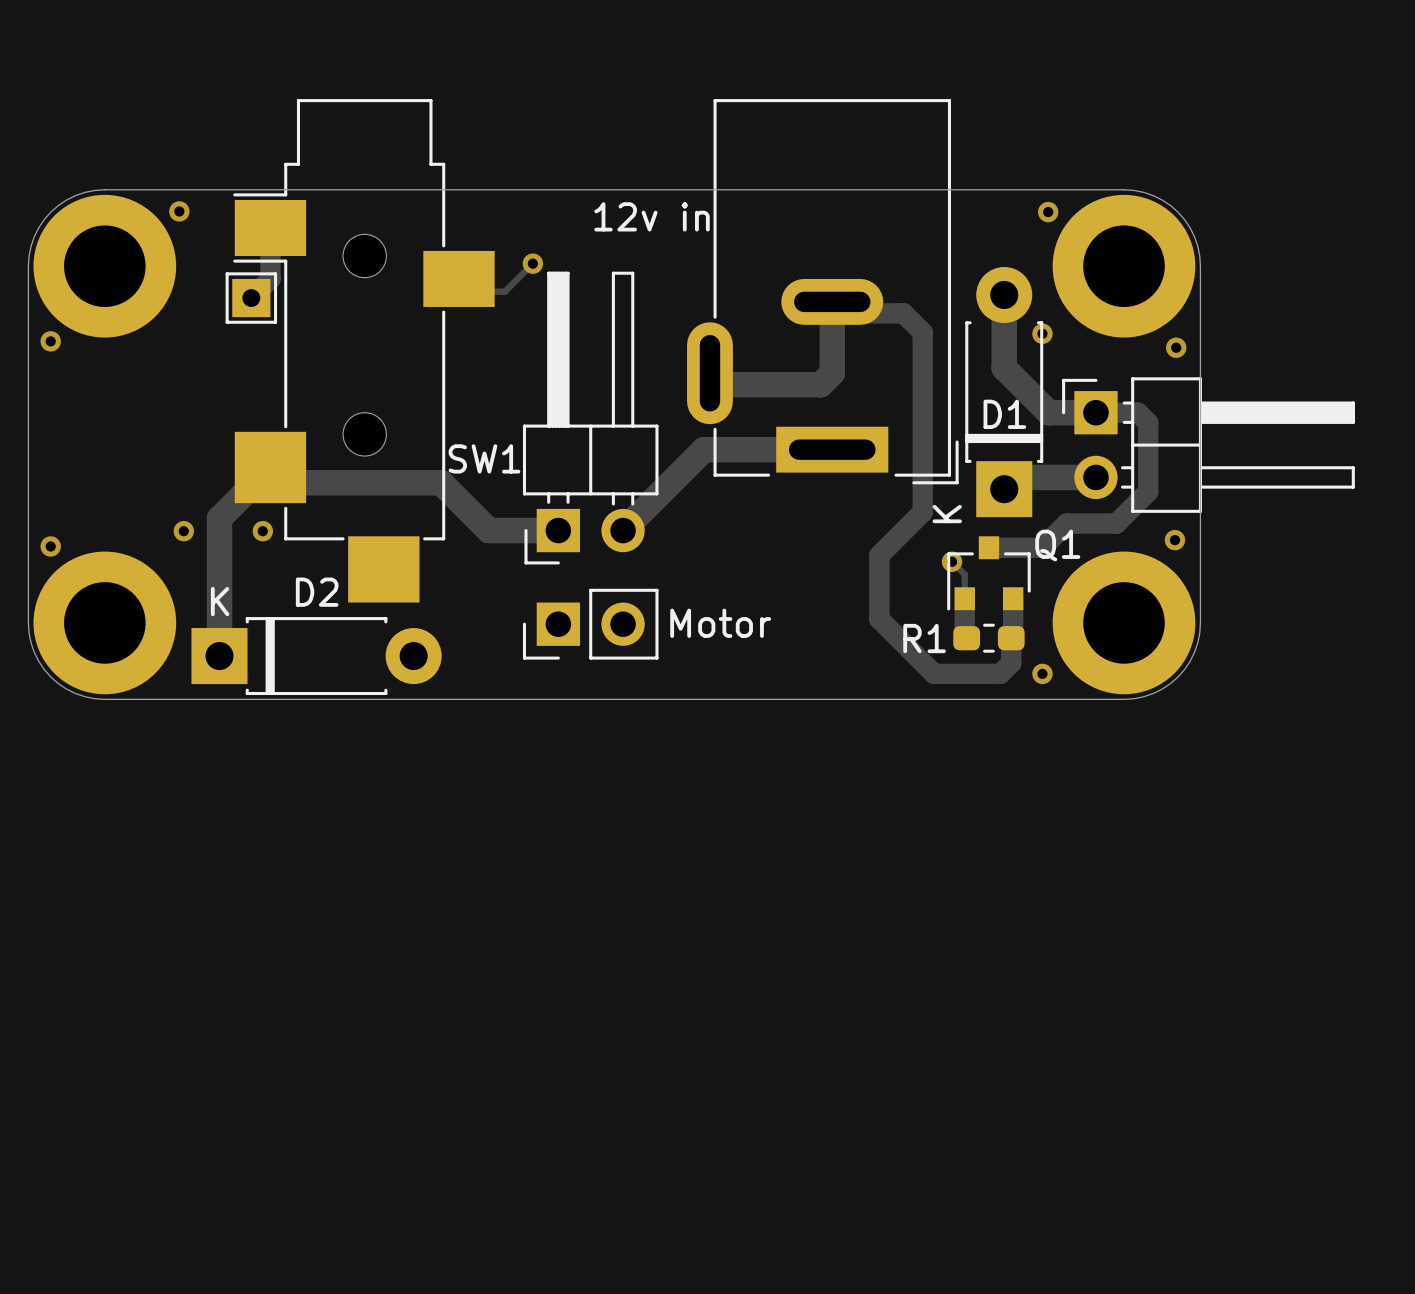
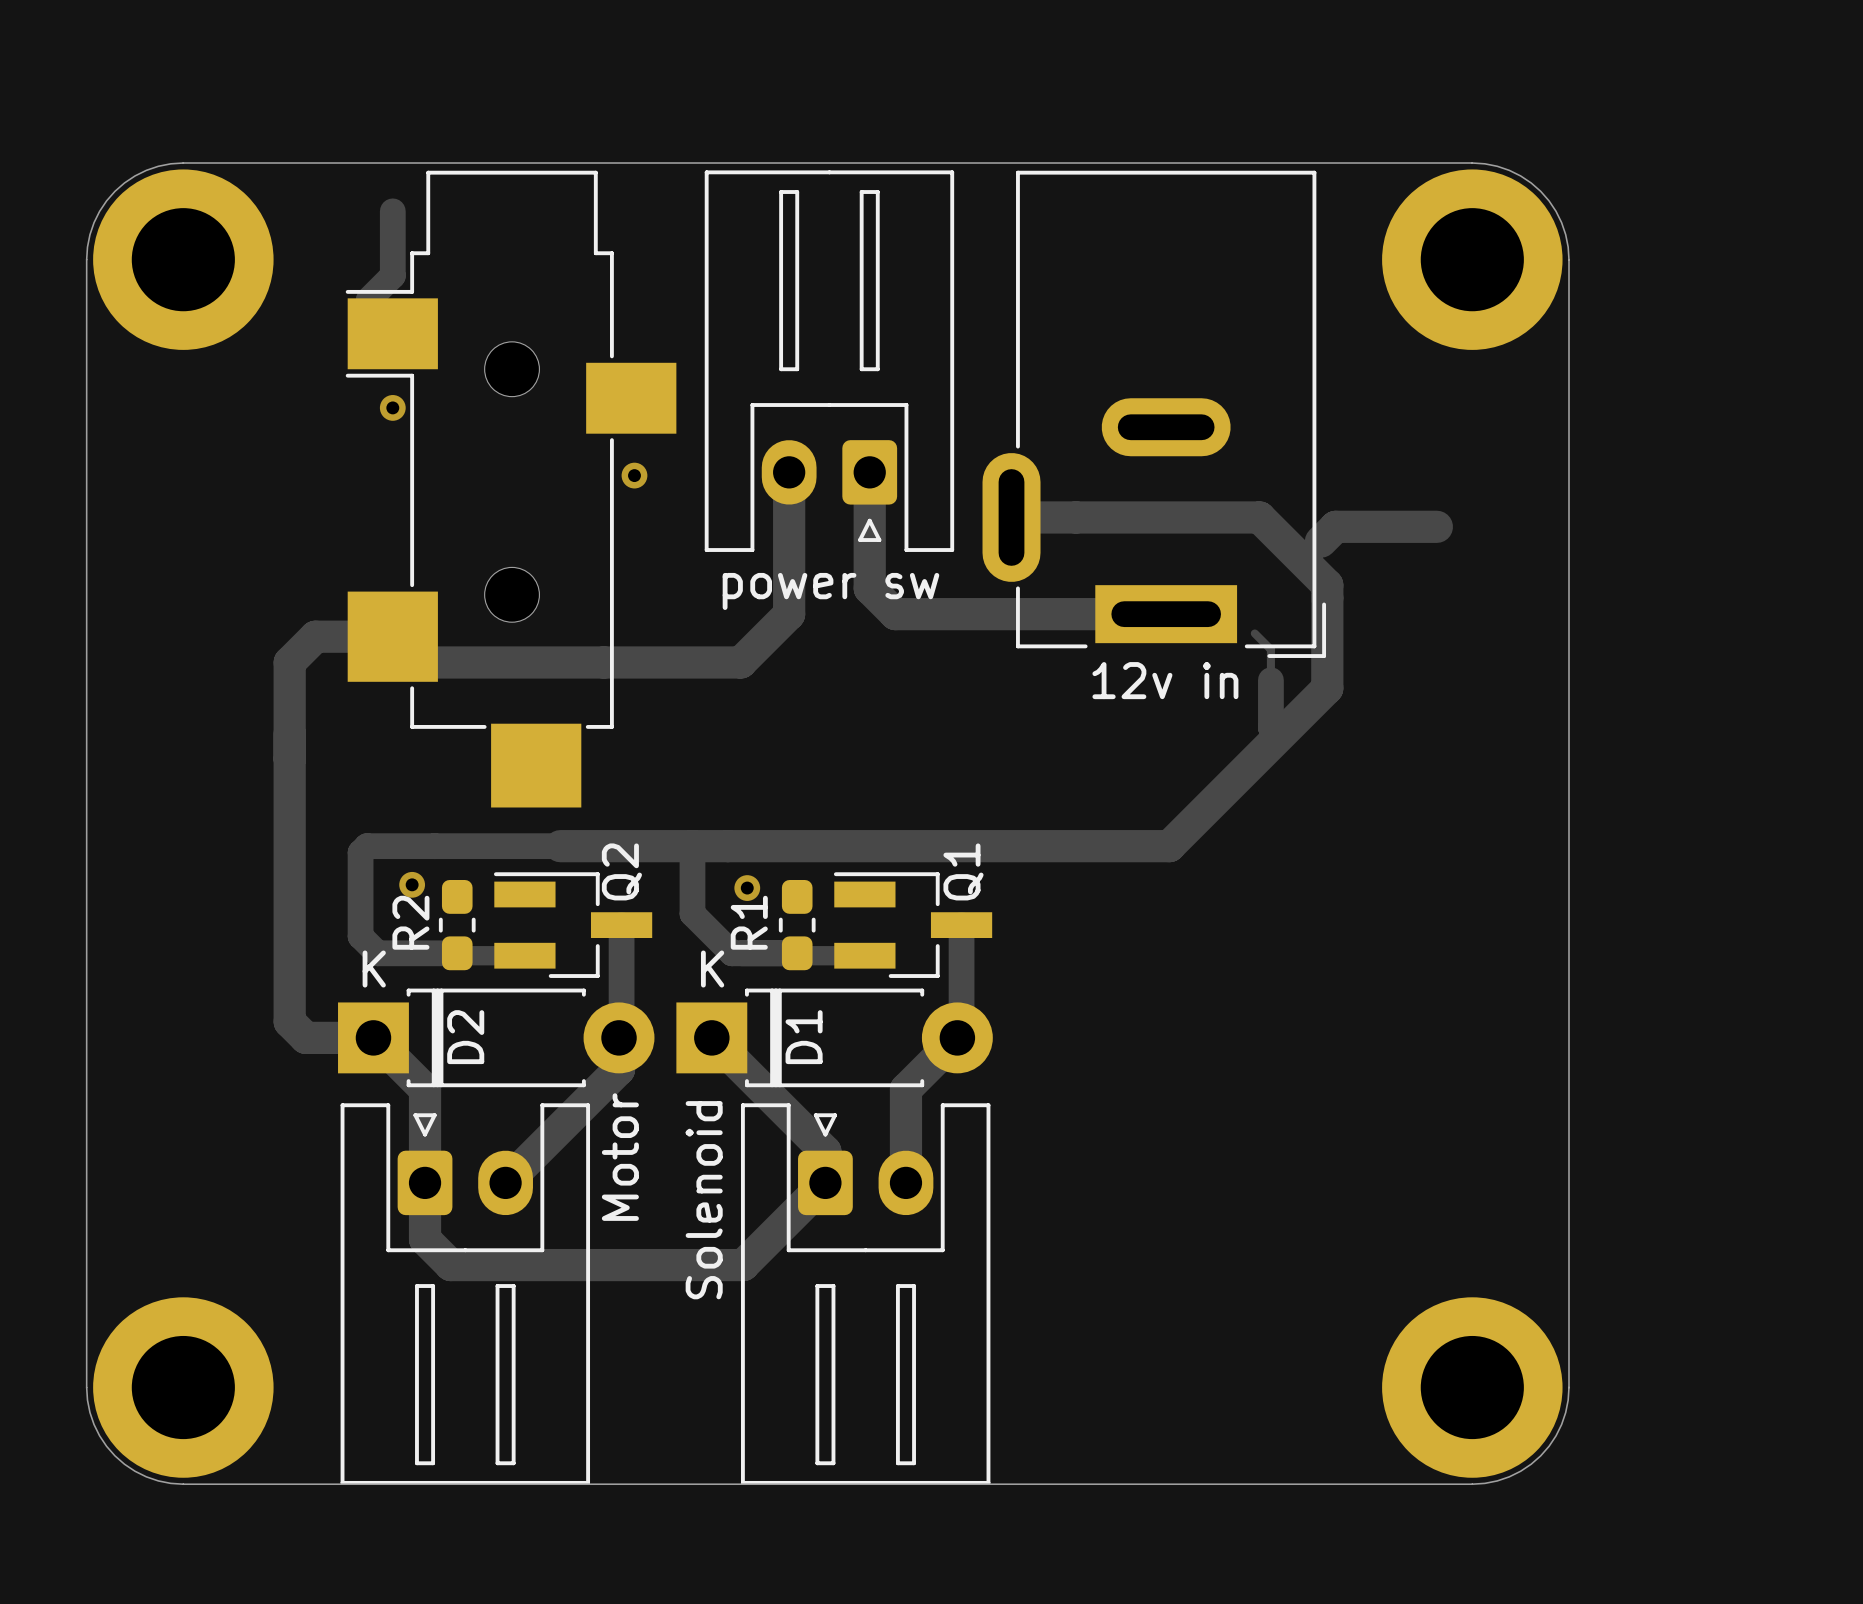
via: (179, 211) -> none
via: (1048, 212) -> none
part value position: 12v in (652, 216) -> 12v in (1165, 680)
track: (532, 263) (504, 291) (458, 291) -> none
via: (532, 263) -> none
D1 footprint: [965, 266, 1044, 518] -> [676, 988, 993, 1088]
part position: (822, 291) -> (1154, 414)
track: (1004, 295) (1004, 368) (1048, 412) (1138, 412) (1148, 422) (1148, 491) (1116, 523) (1066, 523) (1042, 547) (988, 547) -> none
part: (251, 298) -> none
via: (1042, 333) -> none
via: (50, 341) -> none
part: none -> power sw (829, 361)
via: (1176, 347) -> none
part position: (363, 350) -> (511, 489)
via: none -> (392, 407)
track: (709, 384) (820, 384) (832, 373) (832, 313) (903, 313) (922, 332) (922, 512) (879, 555) (879, 619) (934, 673) (1000, 673) (1011, 663) (1013, 598) -> none
SW1: (590, 418) -> none
track: none -> (789, 472) (789, 614) (740, 662) (415, 662) (412, 659)
track: none -> (869, 472) (869, 588) (895, 614) (1166, 614)
via: none -> (634, 475)
part: (1208, 445) -> none
track: (832, 449) (703, 449) (623, 530) -> none
track: (270, 467) (219, 518) (219, 656) -> none
track: none -> (1011, 517) (1259, 517) (1327, 585) (1327, 688) (1169, 846) (367, 846) (360, 852) (360, 936) (377, 953) (524, 955)
track: (280, 482) (441, 482) (488, 530) (558, 530) -> none
via: (183, 531) -> none
via: (262, 531) -> none
Q1 footprint: [947, 536, 1031, 611] -> [833, 872, 993, 978]
via: (1174, 540) -> none
via: (50, 546) -> none
via: (952, 561) -> none
track: none -> (392, 636) (315, 636) (289, 662) (289, 1021) (305, 1037) (373, 1037) (425, 1089) (425, 1239) (450, 1265) (743, 1265) (825, 1182) (825, 1151) (711, 1037)
D2 name rotation: 0° (317, 592) -> 90° counterclockwise (465, 1037)
D2 name position: D2 (317, 592) -> D2 (465, 1037)
board edge: (28, 622) (34, 652) (50, 676) (75, 693) (104, 699) (1133, 698) (1162, 689) (1184, 669) (1194, 652) (1200, 622) -> (86, 710) (87, 1400) (94, 1424) (99, 1435) (114, 1455) (135, 1471) (146, 1476) (170, 1483) (183, 1484) (1472, 1484) (1497, 1480) (1520, 1471) (1540, 1455) (1556, 1435) (1565, 1412) (1568, 1387) (1568, 710)
part position: (104, 622) -> (183, 1387)
part position: (1124, 622) -> (1472, 1387)
part: Motor (590, 624) -> none
R1 rotation: 0° (988, 638) -> 90° clockwise (797, 925)
R1 position: (988, 638) -> (797, 925)
D2 position: (316, 656) -> (496, 1037)
via: (1042, 673) -> none
track: none -> (692, 846) (692, 913) (731, 953) (864, 955)
via: none -> (412, 884)
via: none -> (747, 888)
R2: none -> (457, 925)
Q2: none -> (573, 925)
track: none -> (621, 925) (621, 1035) (619, 1037) (619, 1069) (505, 1182)
track: none -> (961, 925) (961, 1033) (905, 1089) (905, 1182)
part: none -> Motor (465, 1294)
part: none -> Solenoid (865, 1294)

